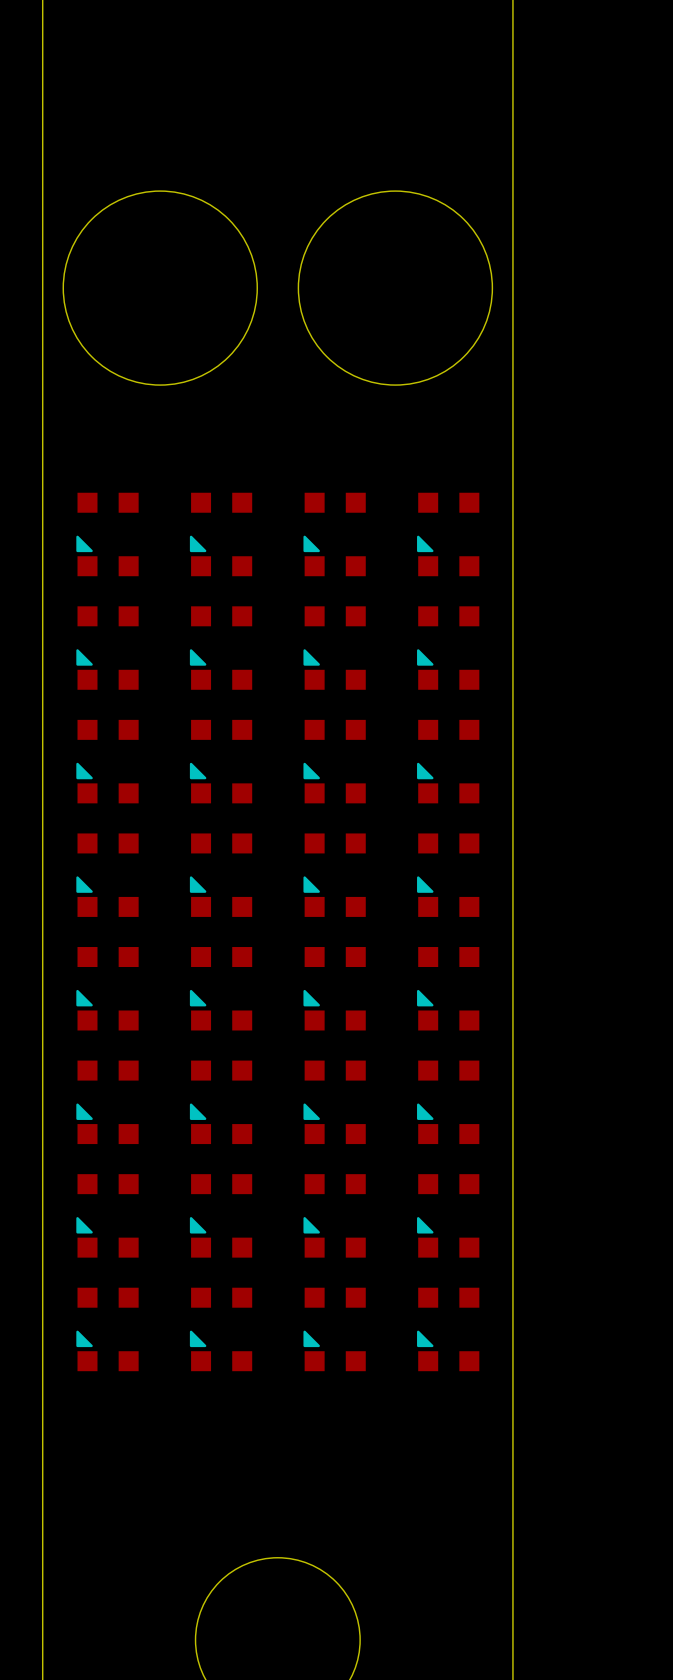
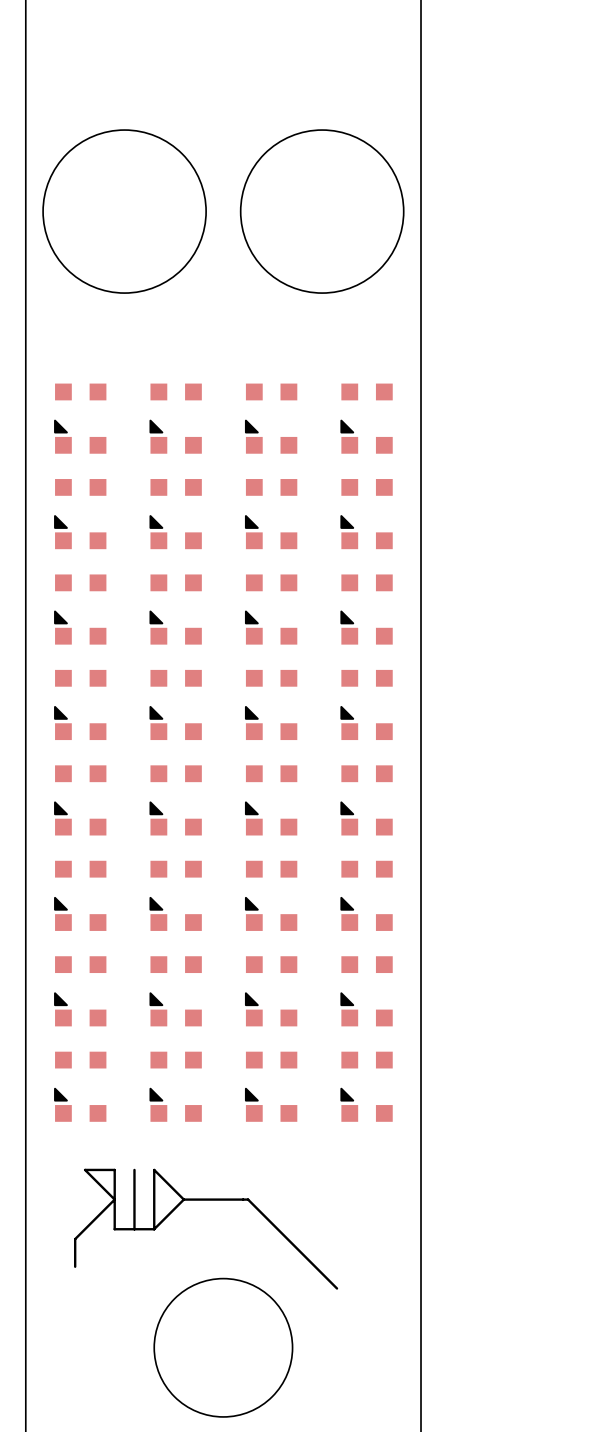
line: none -> (134, 1169) (134, 1229)
line: none -> (183, 1199) (248, 1199) (337, 1288)
line: none -> (183, 1199) (154, 1229)
line: none -> (183, 1199) (154, 1169) (154, 1229)
line: none -> (154, 1229) (114, 1229) (114, 1169) (85, 1169) (114, 1199) (75, 1239) (75, 1266)

